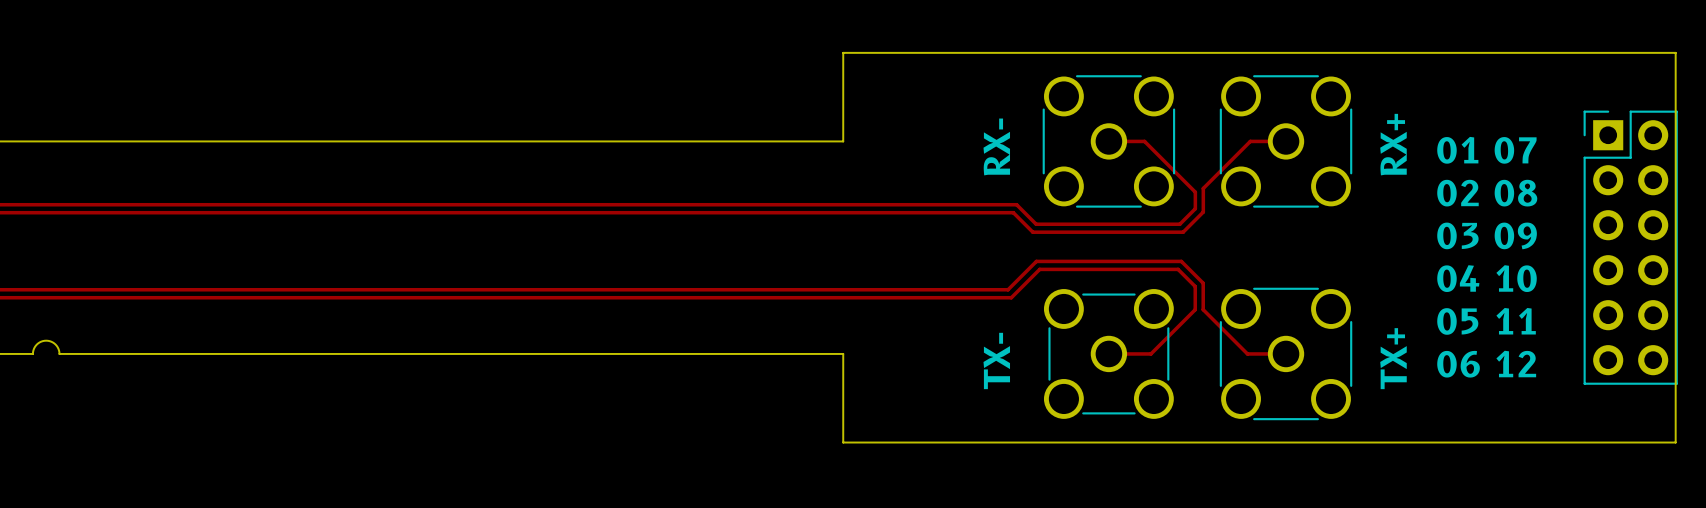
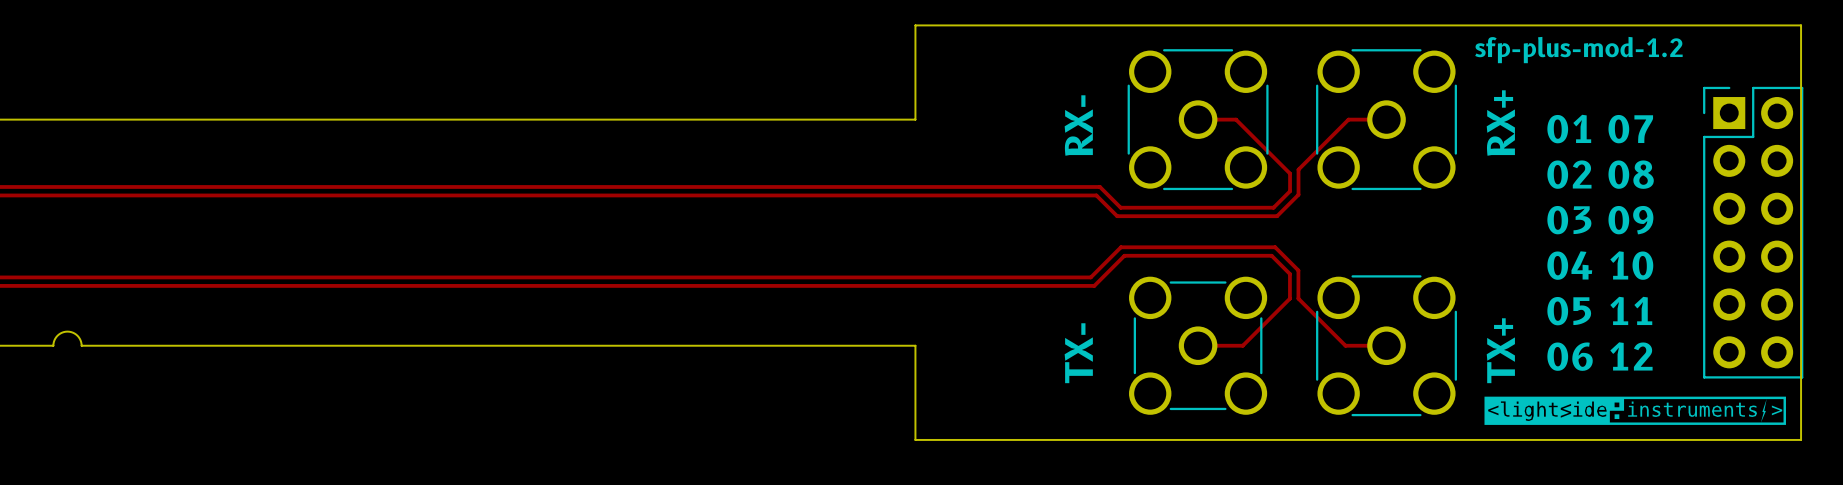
text: none -> sfp-plus-mod-1.2 (1578, 50)
drawing: none -> [1484, 396, 1786, 425]

